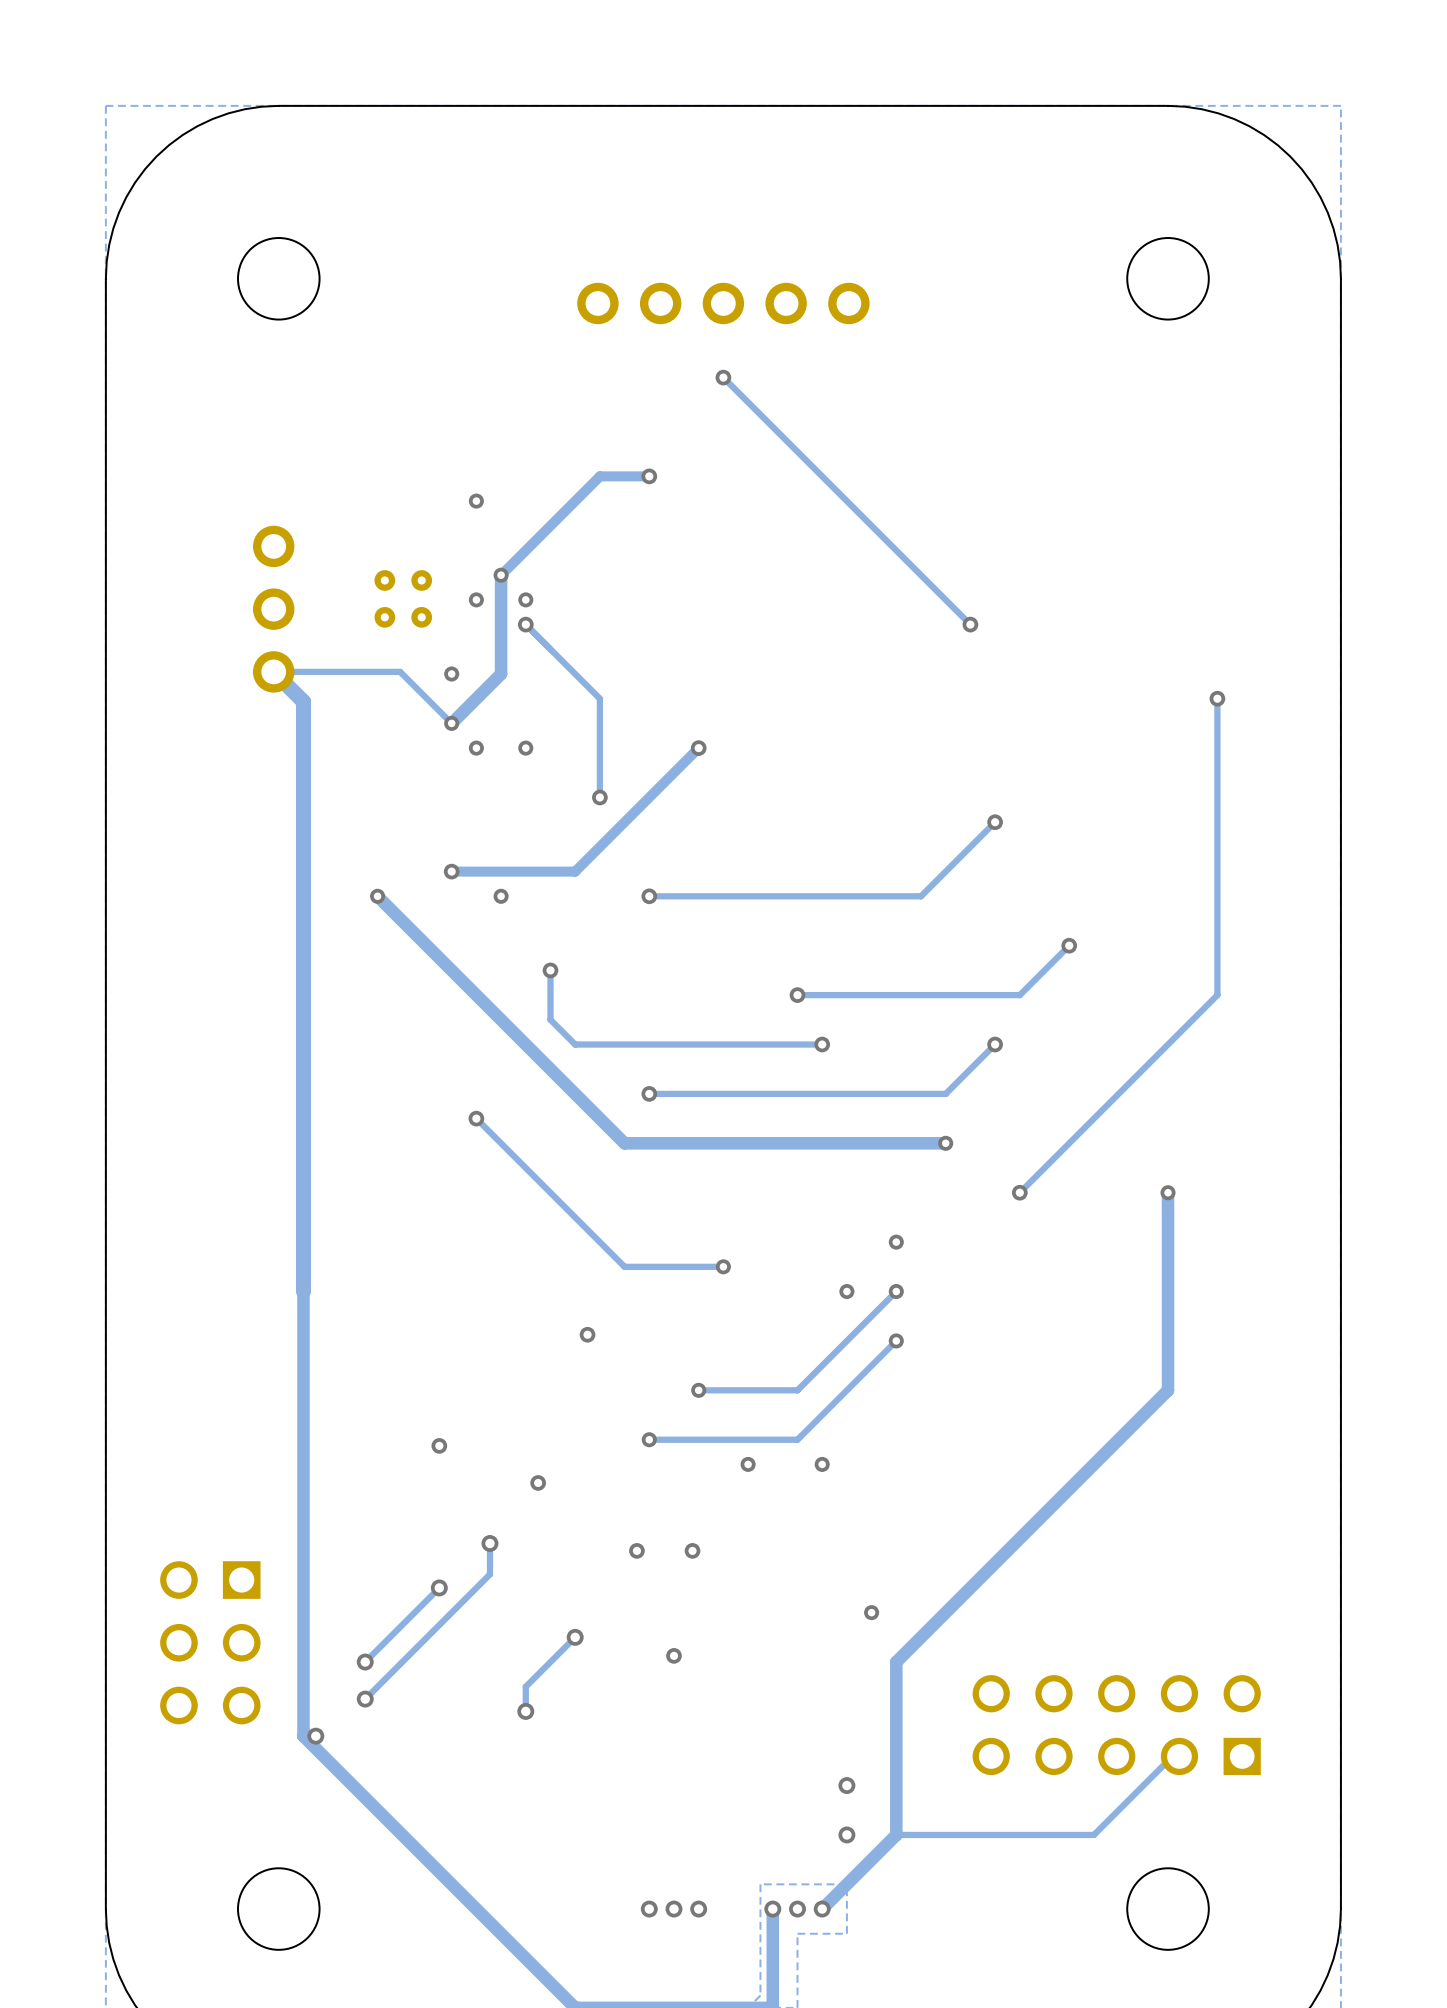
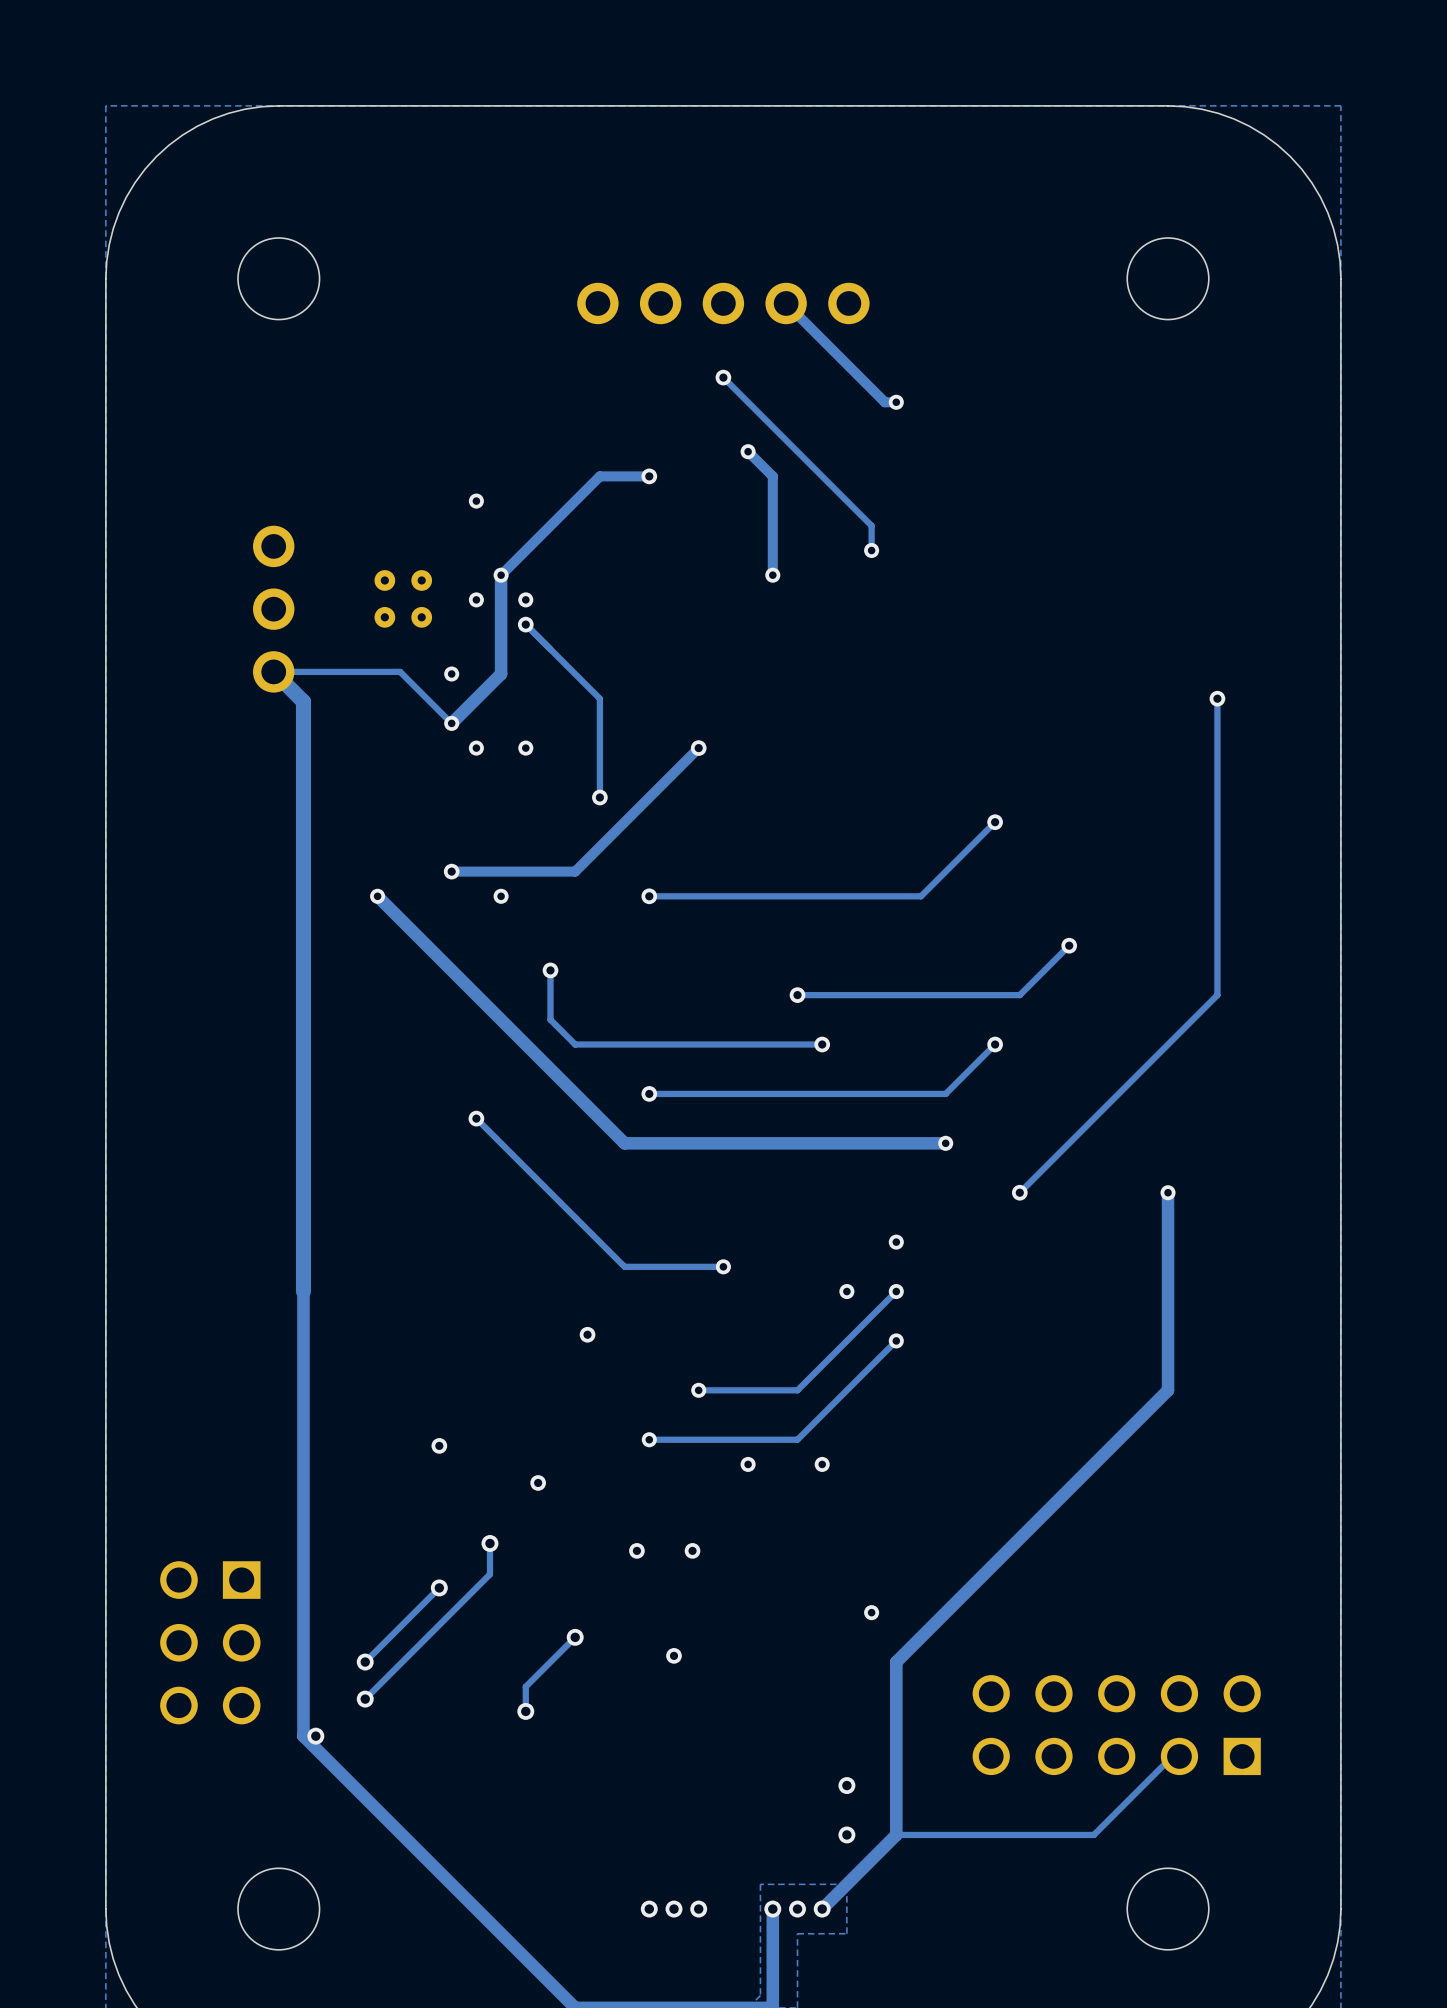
track: none -> (786, 303) (884, 402) (896, 402)
via: none -> (896, 402)
track: none -> (748, 451) (772, 476) (772, 575)
via: none -> (748, 451)
track: (871, 525) (970, 624) -> (871, 525) (871, 550)
via: none -> (871, 550)
via: none -> (772, 575)
via: (970, 624) -> none

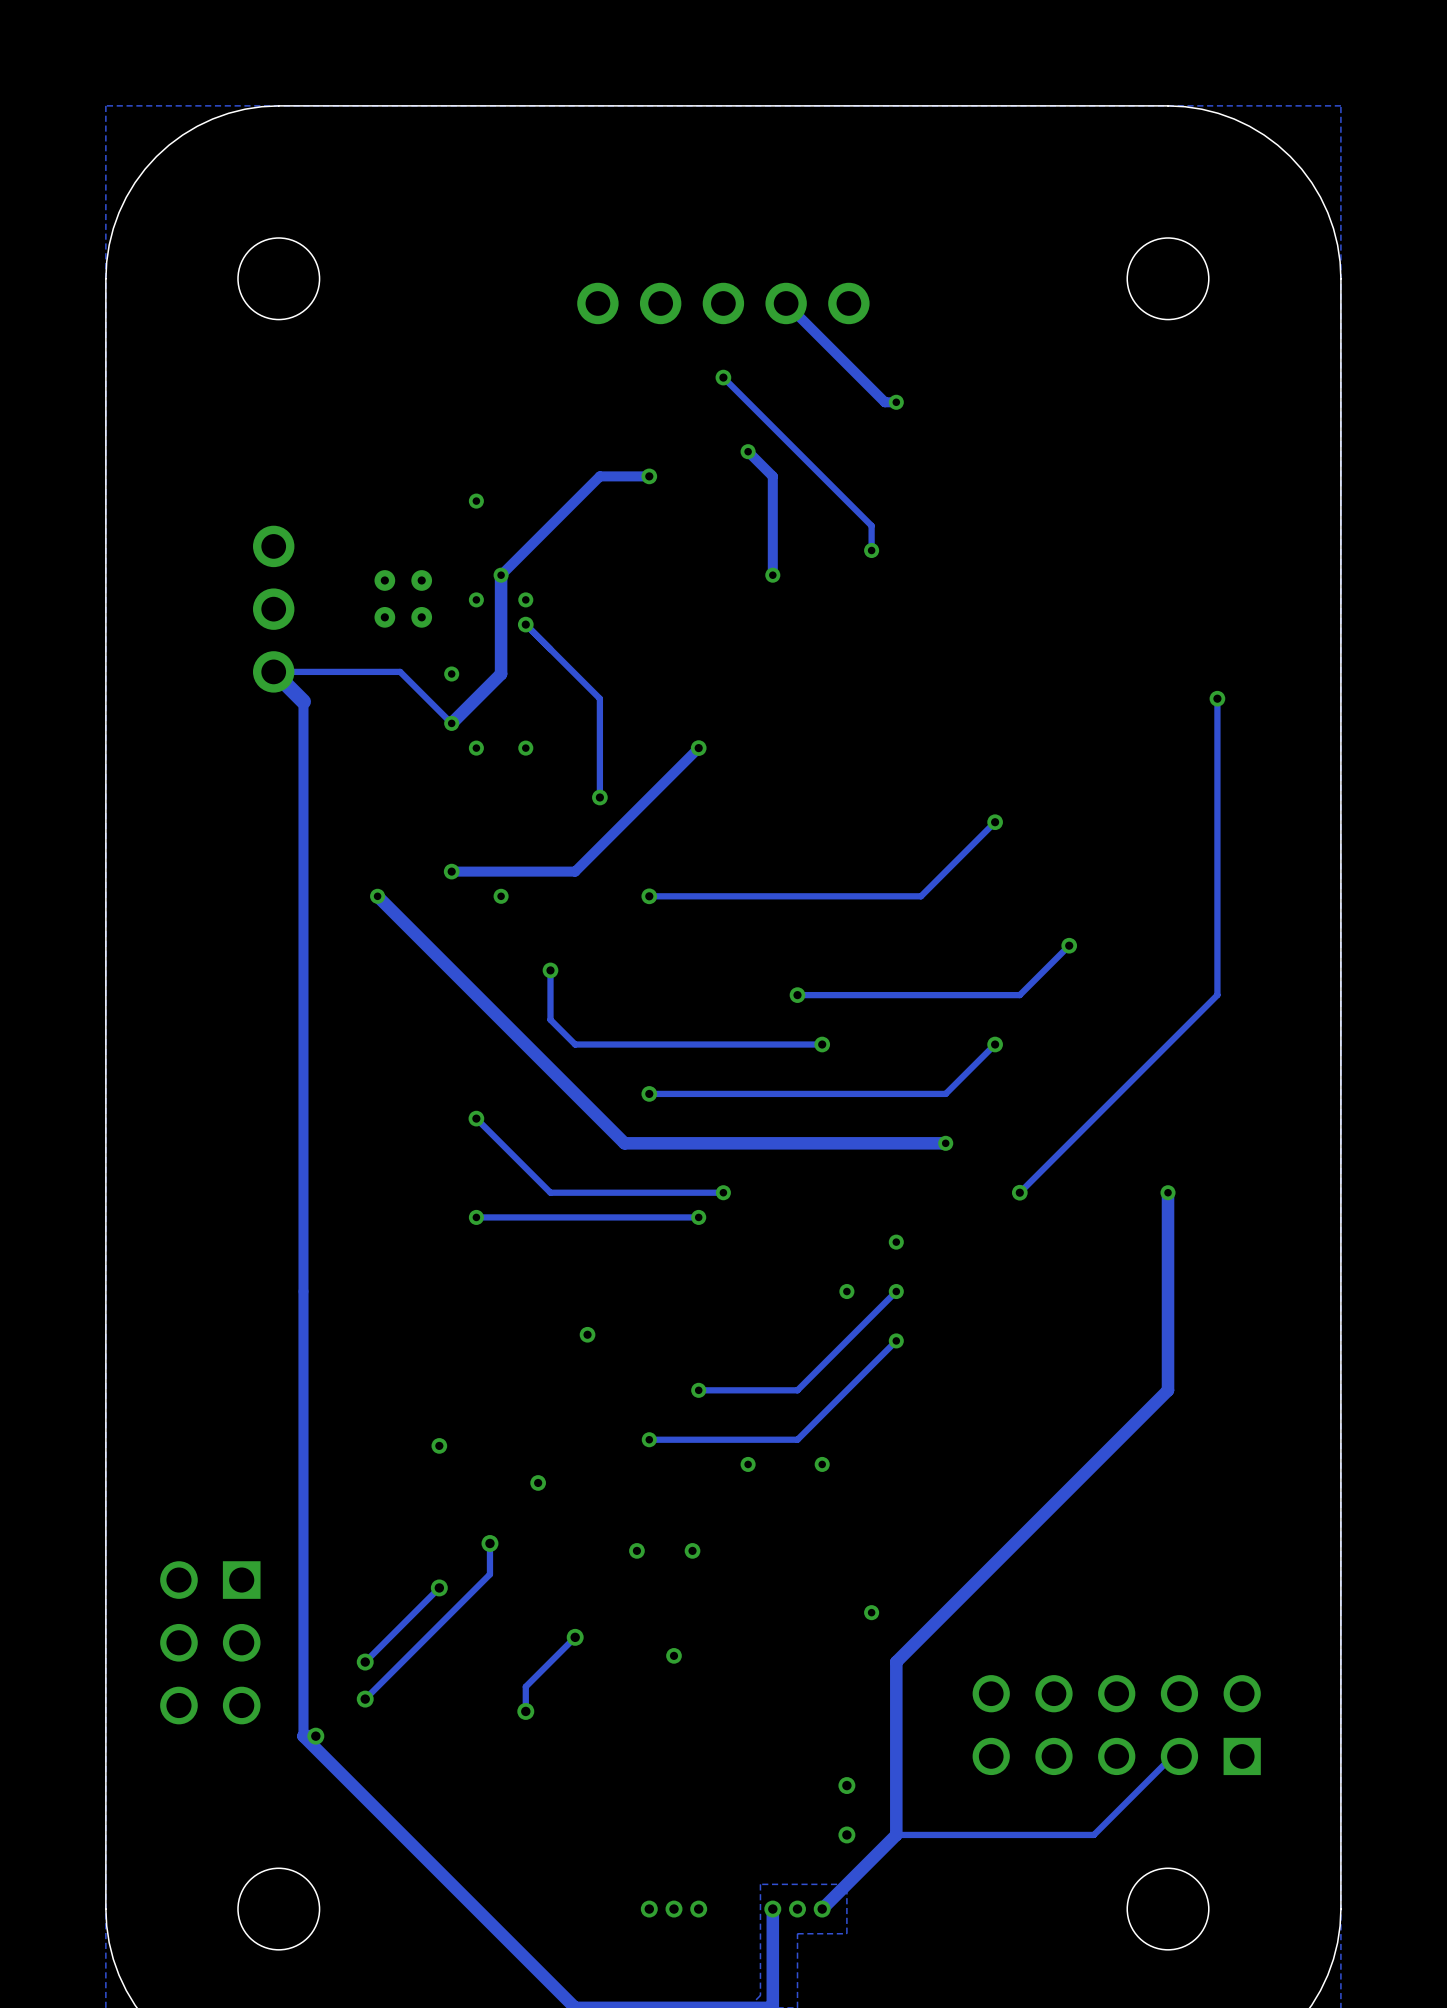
track width: thick (303, 701) (303, 1736) -> thin (303, 701) (303, 1736)
track: (550, 1192) (624, 1266) (723, 1266) -> (550, 1192) (723, 1192)
via: none -> (723, 1192)
via: none -> (476, 1217)
track: none -> (698, 1217) (476, 1217)
via: none -> (698, 1217)
via: (723, 1266) -> none

